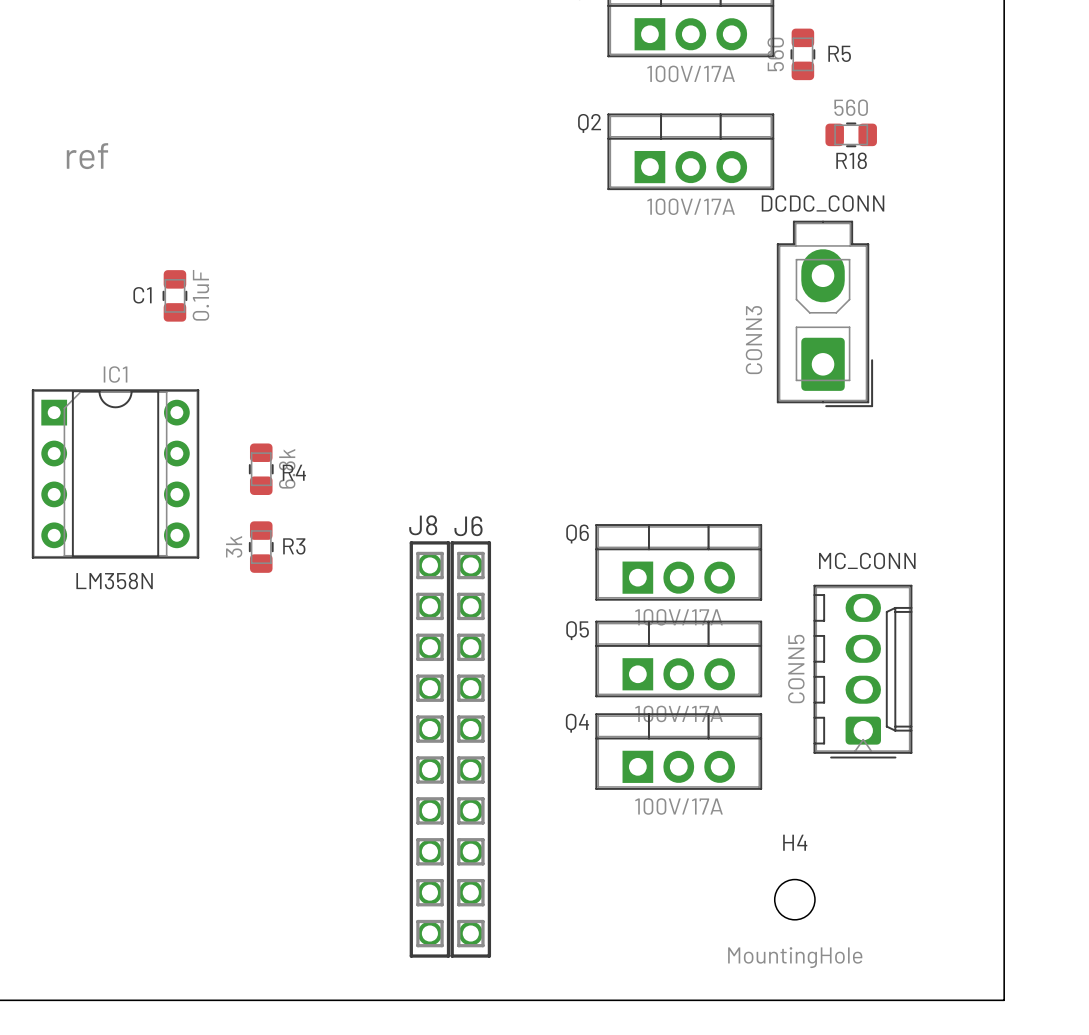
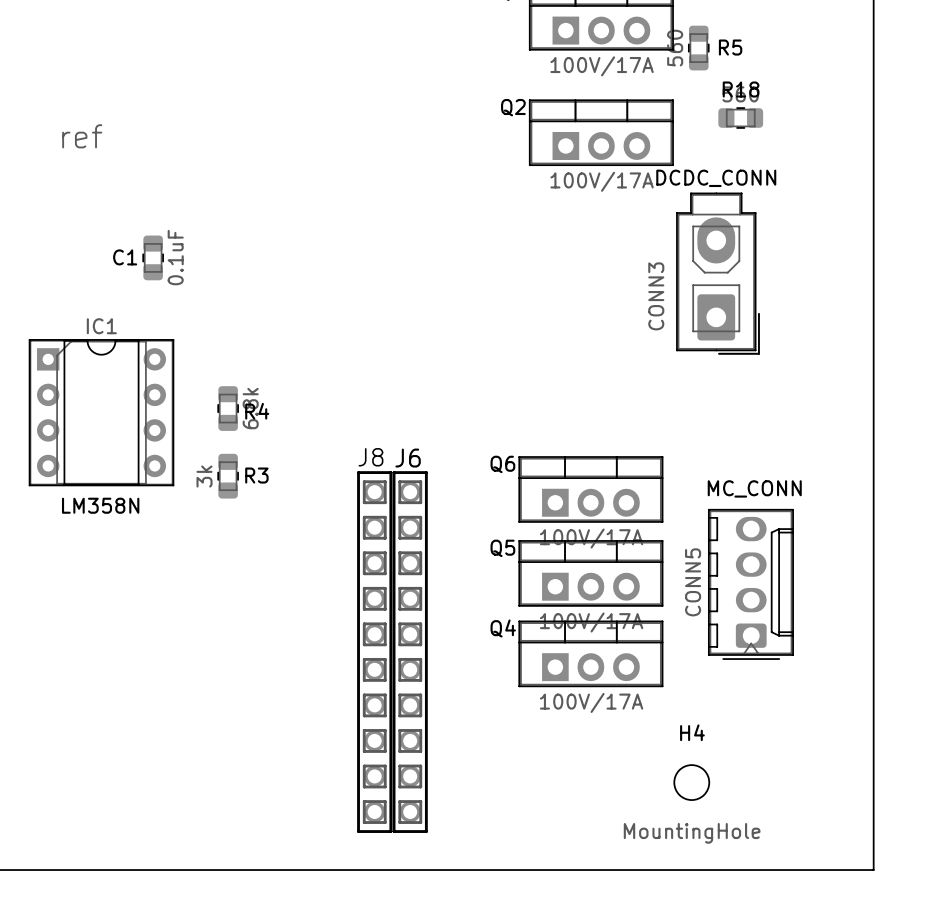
R18 name position: R18 (851, 160) -> R18 (741, 89)

